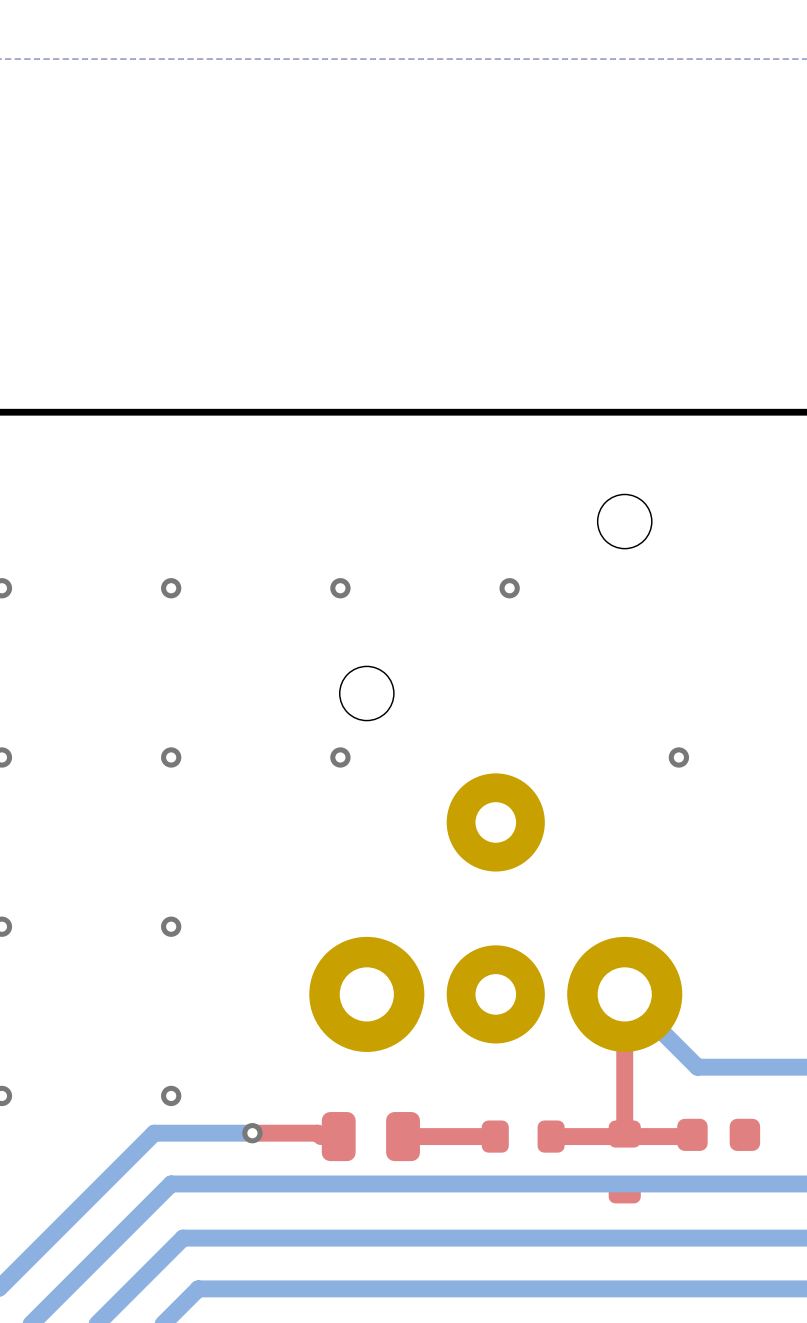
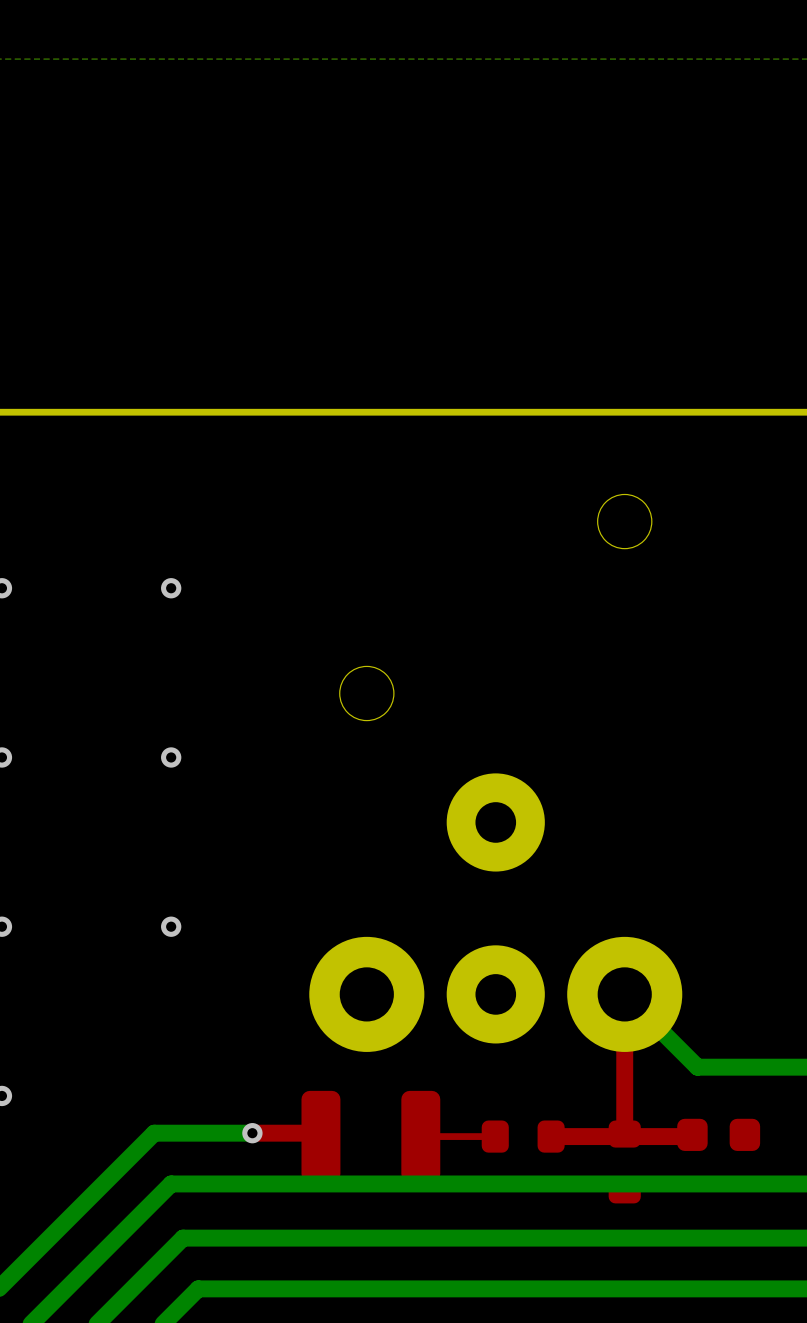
via: (340, 588) -> none
via: (509, 588) -> none
via: (340, 757) -> none
via: (678, 757) -> none
via: (171, 1095) -> none
part footprint: [321, 1112, 420, 1162] -> [301, 1090, 441, 1183]
top track width: thick (495, 1136) (420, 1136) -> thin (495, 1136) (420, 1136)

